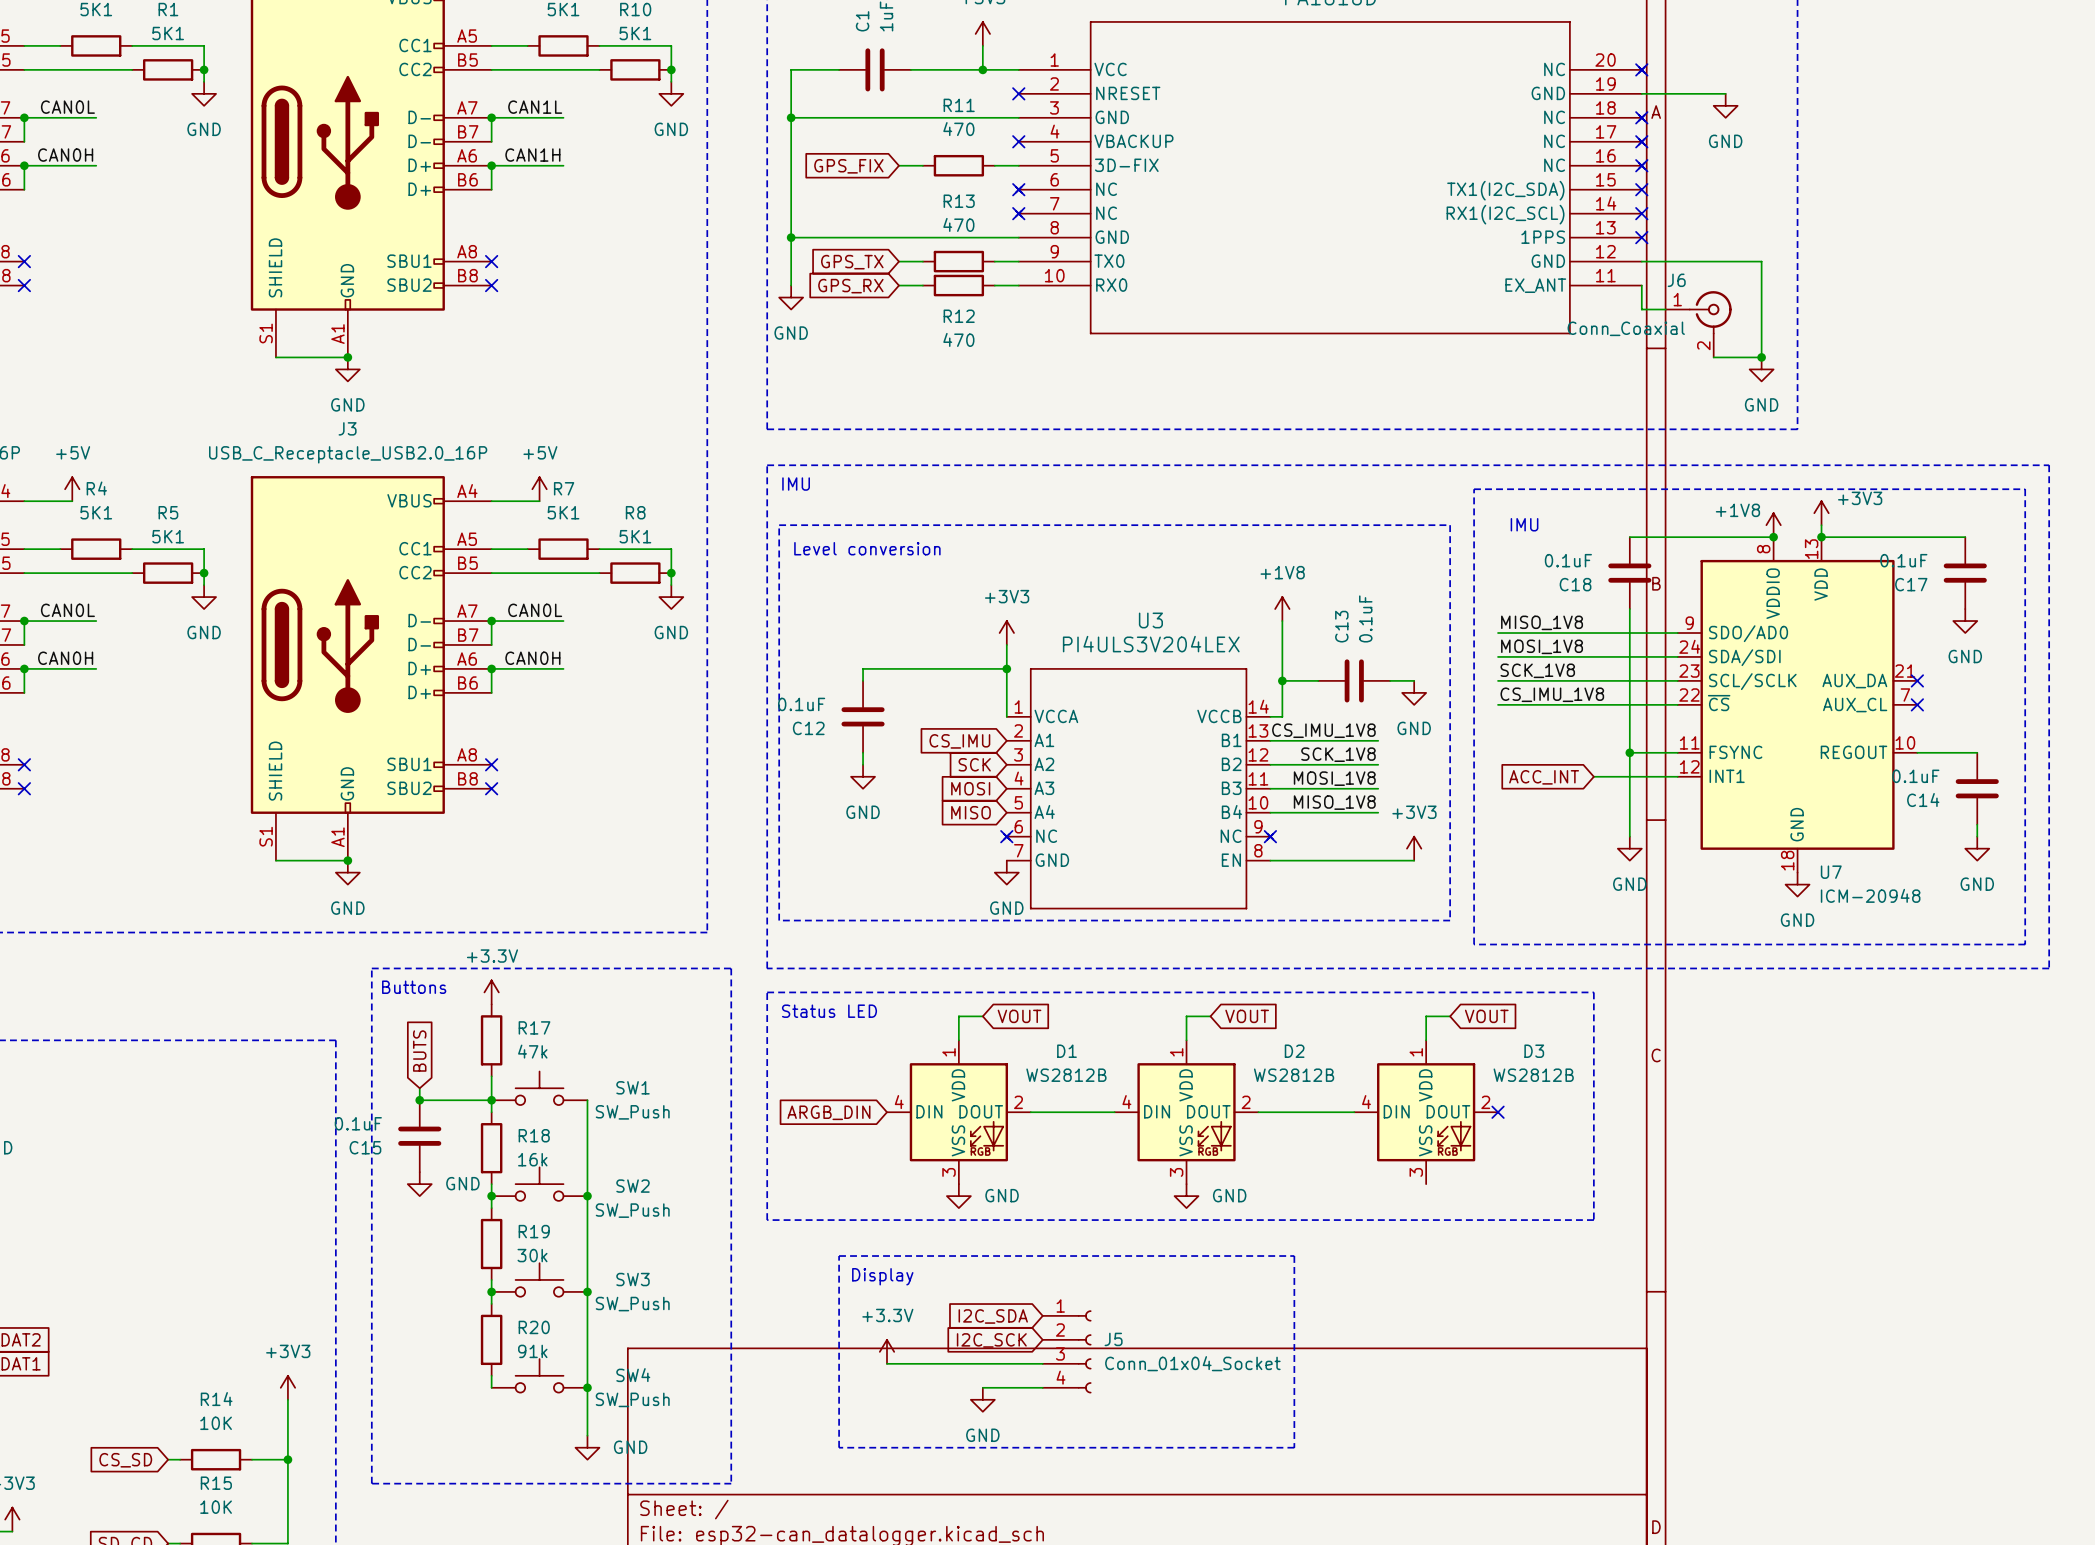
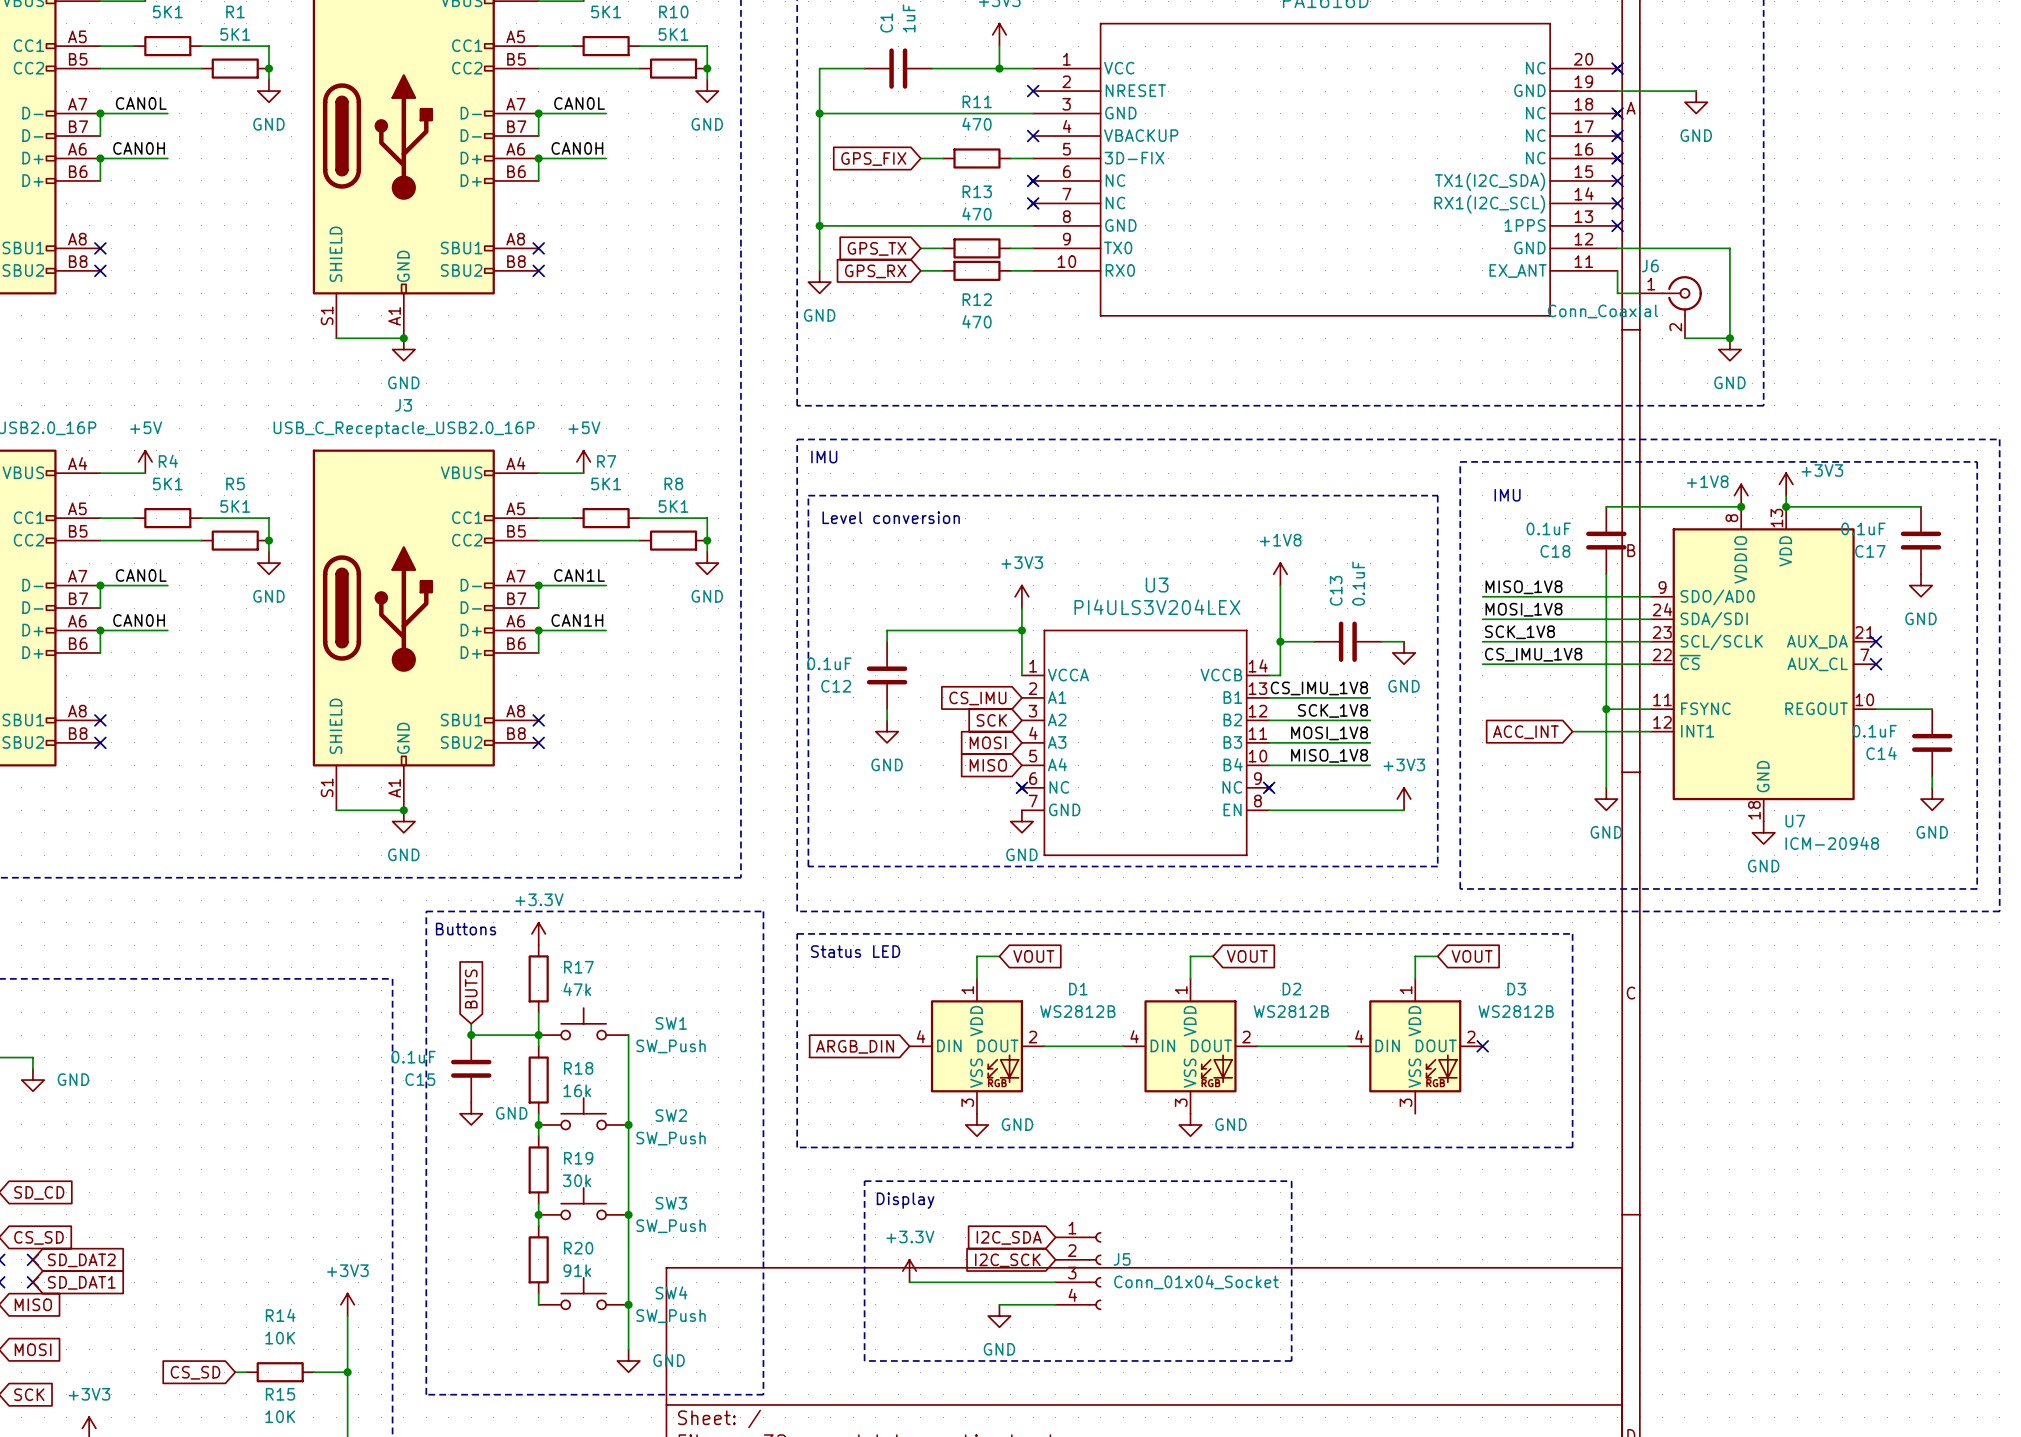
label: CAN1L (535, 107) -> CAN0L (579, 103)
label: CAN1H (532, 155) -> CAN0H (577, 148)
label: CAN0L (535, 610) -> CAN1L (579, 575)
label: CAN0H (532, 658) -> CAN1H (577, 620)

